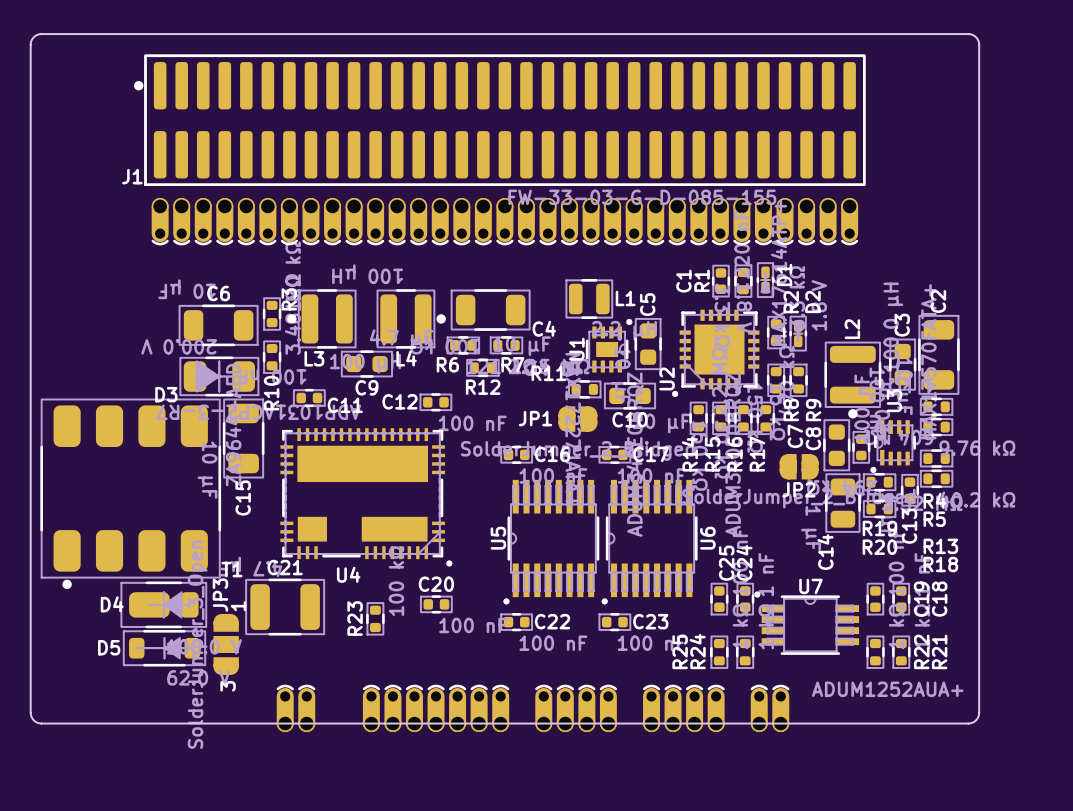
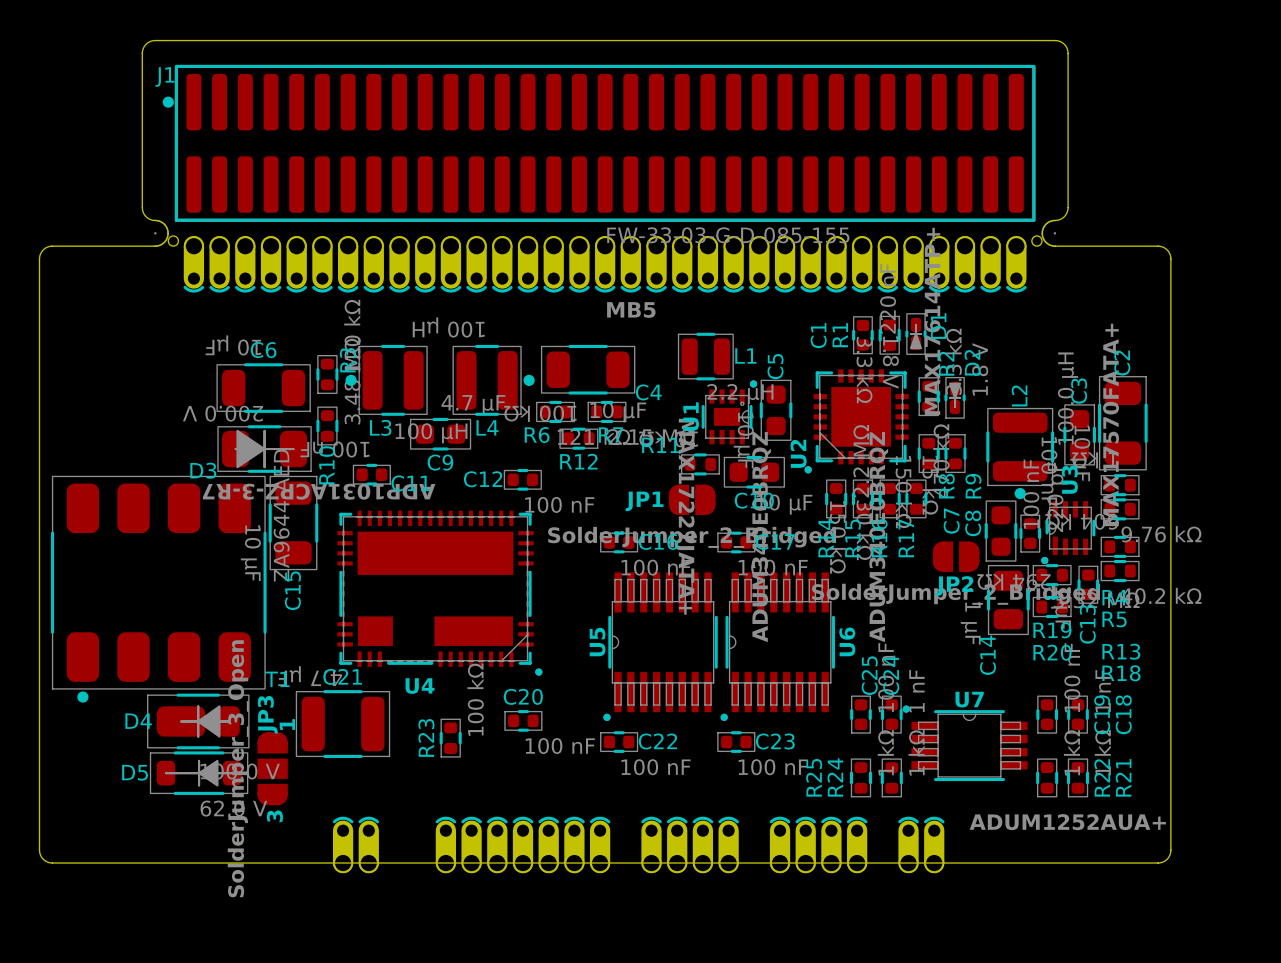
board edge: (127, 34) (40, 34) (31, 40) (30, 217) -> (155, 40) (147, 43) (142, 51) (142, 209) (147, 217) (160, 221) (165, 225) (167, 231) (166, 238) (162, 244) (156, 246) (50, 246) (42, 251) (39, 259)
board edge: (882, 34) (969, 34) (978, 40) (979, 217) -> (1055, 40) (1064, 44) (1068, 51) (1068, 209) (1063, 217) (1049, 221) (1045, 225) (1042, 231) (1043, 238) (1048, 244) (1053, 246) (1159, 246) (1168, 251) (1170, 259)
J1 name position: J1 (132, 176) -> J1 (165, 77)
MB5: none -> (605, 233)

